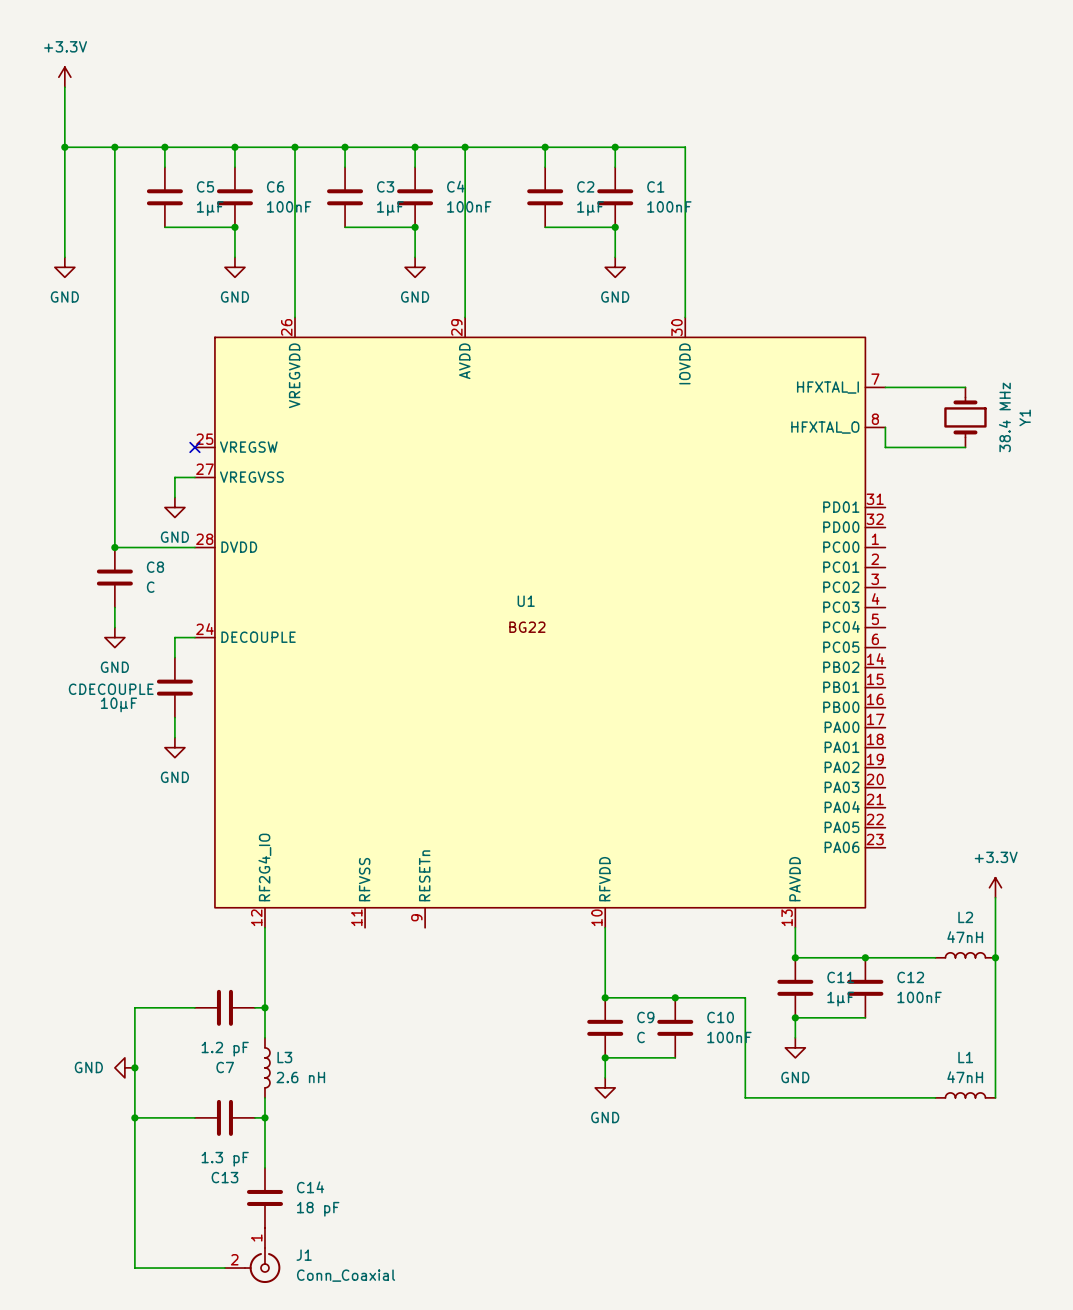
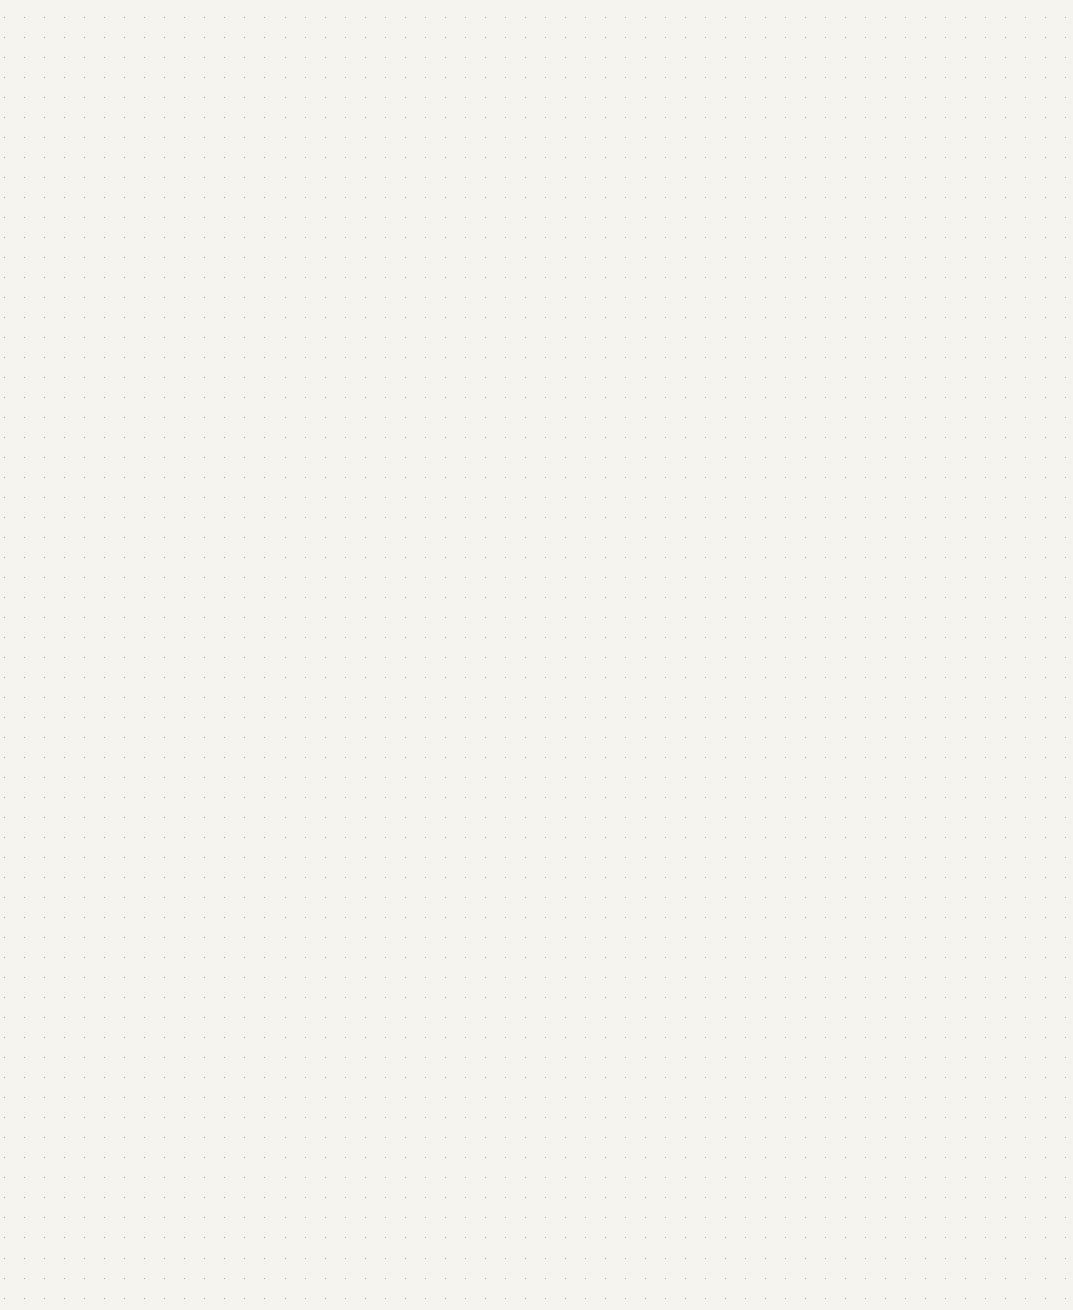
power symbol: +3.3V (64, 77) -> none
wire: (64, 87) (64, 257) -> none
wire: (64, 147) (685, 147) (685, 317) -> none
junction: (64, 147) -> none
wire: (114, 147) (114, 547) (194, 547) -> none
junction: (114, 147) -> none
wire: (164, 147) (164, 167) -> none
junction: (164, 147) -> none
wire: (234, 147) (234, 167) -> none
junction: (234, 147) -> none
wire: (295, 147) (295, 317) -> none
junction: (295, 147) -> none
wire: (345, 147) (345, 167) -> none
junction: (345, 147) -> none
wire: (415, 147) (415, 167) -> none
junction: (415, 147) -> none
wire: (465, 147) (465, 317) -> none
junction: (465, 147) -> none
wire: (545, 147) (545, 167) -> none
junction: (545, 147) -> none
wire: (615, 147) (615, 167) -> none
junction: (615, 147) -> none
C5: 1µF (164, 197) -> none
C6: 100nF (234, 197) -> none
C3: 1µF (345, 197) -> none
C4: 100nF (415, 197) -> none
C2: 1µF (545, 197) -> none
C1: 100nF (615, 197) -> none
wire: (164, 227) (234, 227) (234, 257) -> none
junction: (234, 227) -> none
wire: (345, 227) (415, 227) (415, 257) -> none
junction: (415, 227) -> none
wire: (545, 227) (615, 227) (615, 257) -> none
junction: (615, 227) -> none
power symbol: GND (64, 267) -> none
power symbol: GND (234, 267) -> none
power symbol: GND (415, 267) -> none
power symbol: GND (615, 267) -> none
wire: (885, 387) (965, 387) -> none
Y1: 38.4 MHz (965, 417) -> none
wire: (885, 427) (885, 447) (965, 447) -> none
no-connect mark: (194, 447) -> none
wire: (194, 477) (174, 477) (174, 497) -> none
power symbol: GND (174, 507) -> none
junction: (114, 547) -> none
C8: C (114, 577) -> none
wire: (114, 607) (114, 627) -> none
U1: (540, 622) -> none
power symbol: GND (114, 637) -> none
wire: (194, 637) (174, 637) (174, 657) -> none
CDECOUPLE: 10µF (174, 687) -> none
wire: (174, 717) (174, 737) -> none
power symbol: GND (174, 747) -> none
power symbol: +3.3V (995, 887) -> none
wire: (995, 897) (995, 1097) -> none
wire: (264, 927) (264, 1037) -> none
wire: (605, 927) (605, 997) (745, 997) (745, 1097) (935, 1097) -> none
wire: (795, 927) (795, 957) (935, 957) -> none
L2: 47nH (965, 955) -> none
junction: (795, 957) -> none
junction: (865, 957) -> none
junction: (995, 957) -> none
C11: 1µF (795, 987) -> none
C12: 100nF (865, 987) -> none
junction: (605, 997) -> none
junction: (675, 997) -> none
wire: (194, 1007) (134, 1007) (134, 1268) (224, 1268) -> none
C7: 1.2 pF (224, 1007) -> none
wire: (254, 1007) (264, 1007) -> none
junction: (264, 1007) -> none
junction: (795, 1017) -> none
wire: (865, 1017) (795, 1017) (795, 1037) -> none
C9: C (605, 1027) -> none
C10: 100nF (675, 1027) -> none
power symbol: GND (795, 1047) -> none
junction: (605, 1057) -> none
wire: (675, 1057) (605, 1057) (605, 1077) -> none
power symbol: GND (124, 1067) -> none
junction: (134, 1067) -> none
L3: 2.6 nH (267, 1067) -> none
power symbol: GND (605, 1087) -> none
L1: 47nH (965, 1095) -> none
wire: (264, 1097) (264, 1167) -> none
wire: (134, 1117) (194, 1117) -> none
junction: (134, 1117) -> none
C13: 1.3 pF (224, 1117) -> none
wire: (254, 1117) (264, 1117) -> none
junction: (264, 1117) -> none
C14: 18 pF (264, 1197) -> none
J1: Conn_Coaxial (252, 1255) -> none

